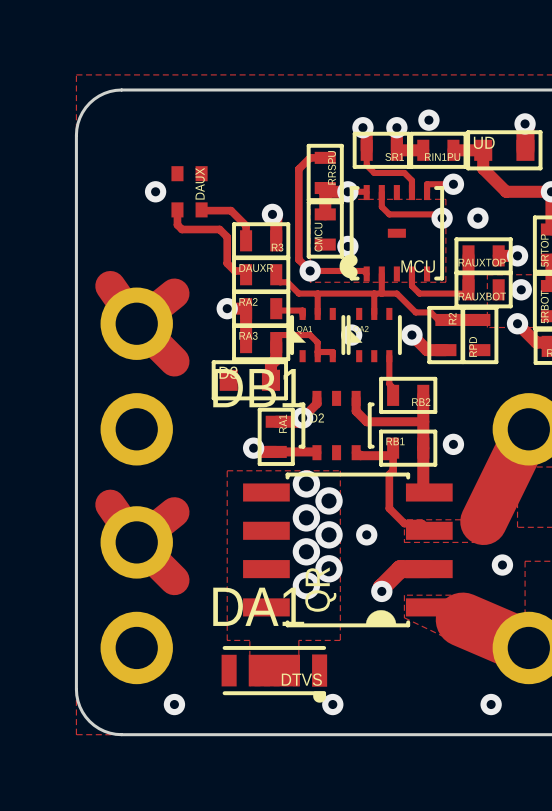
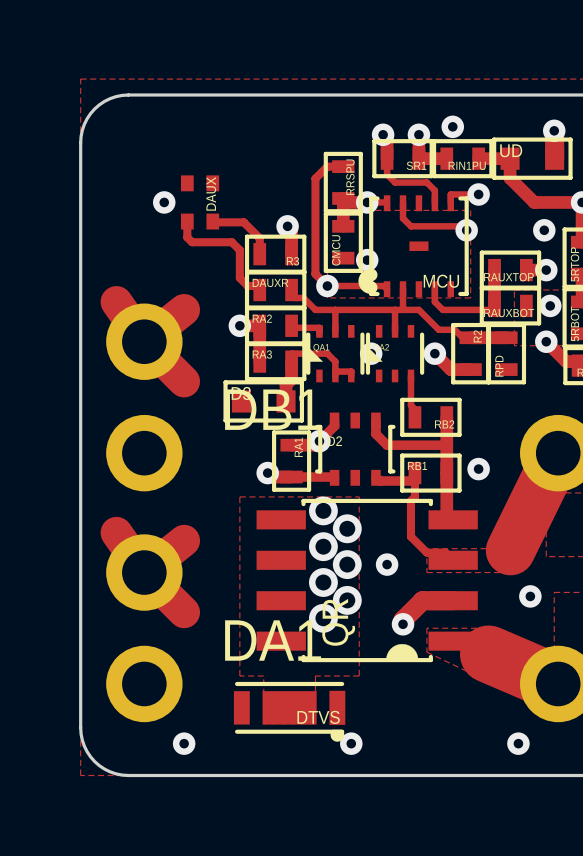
via position: (477, 218) -> (544, 230)

